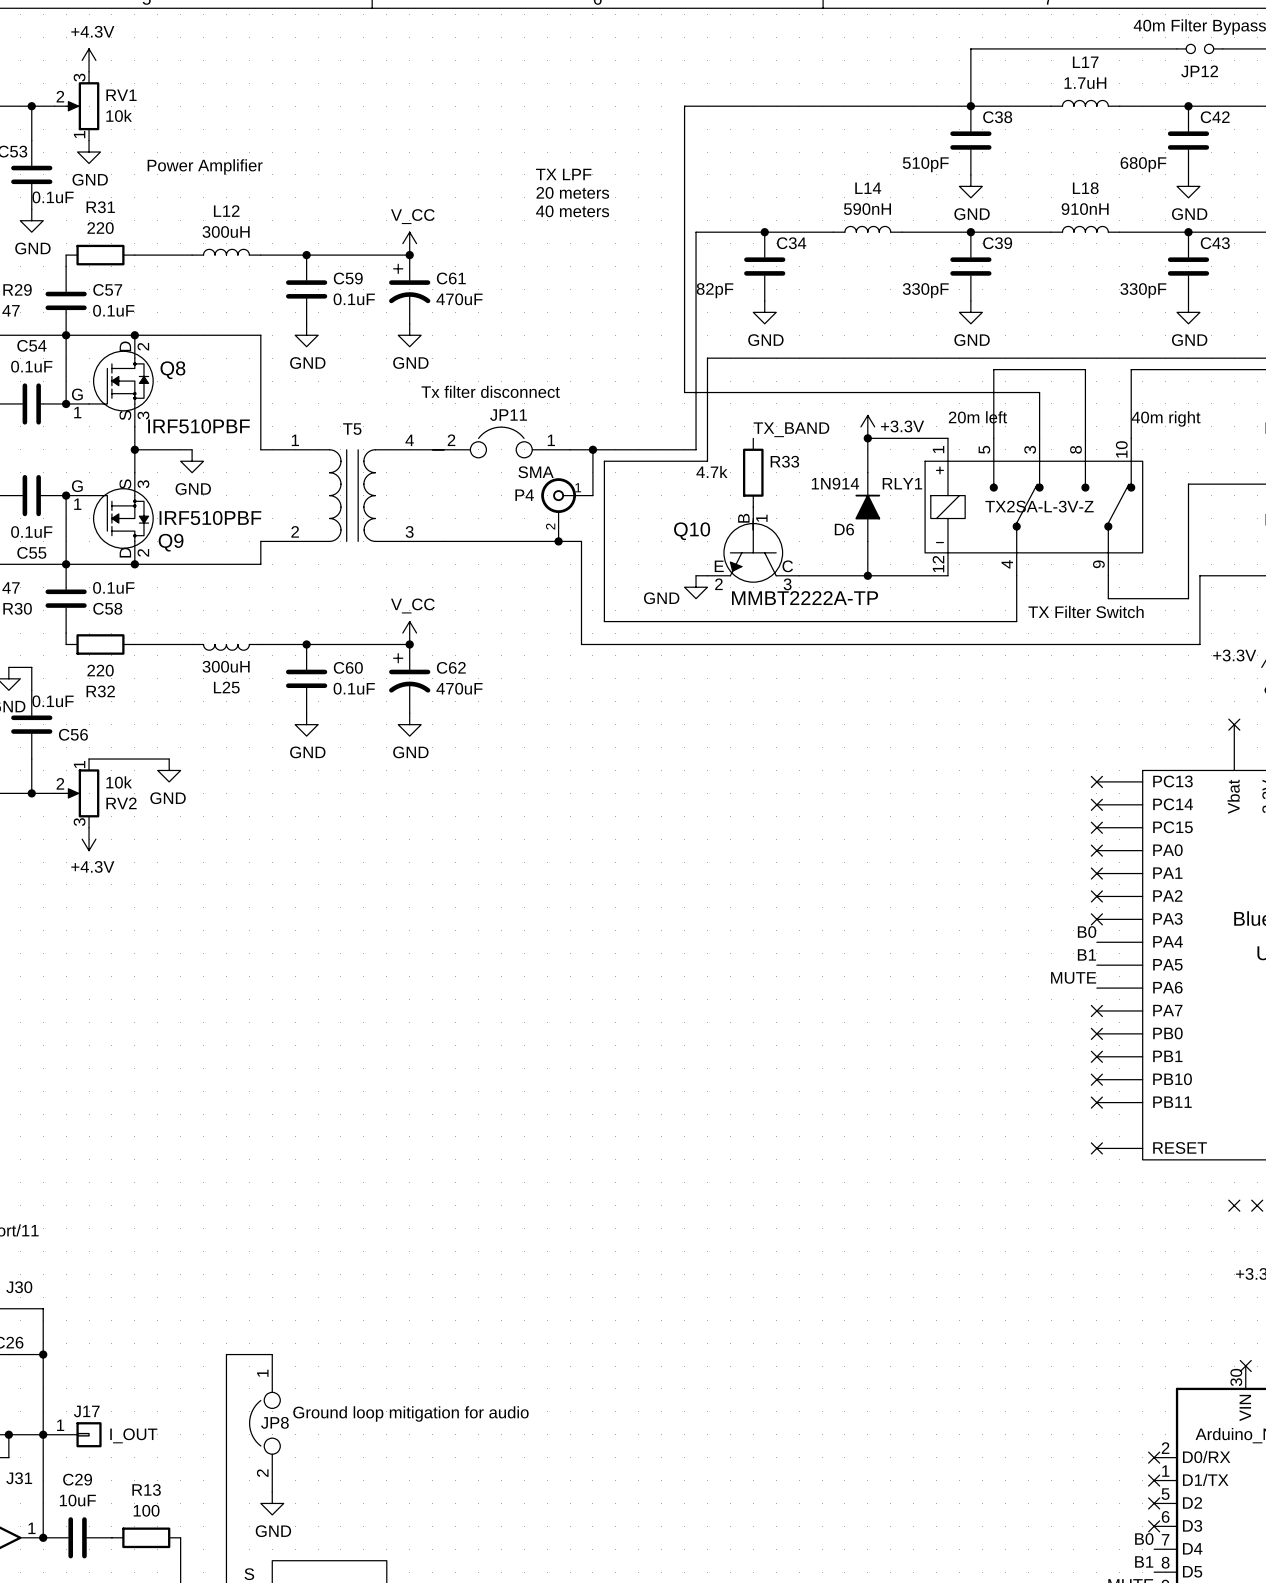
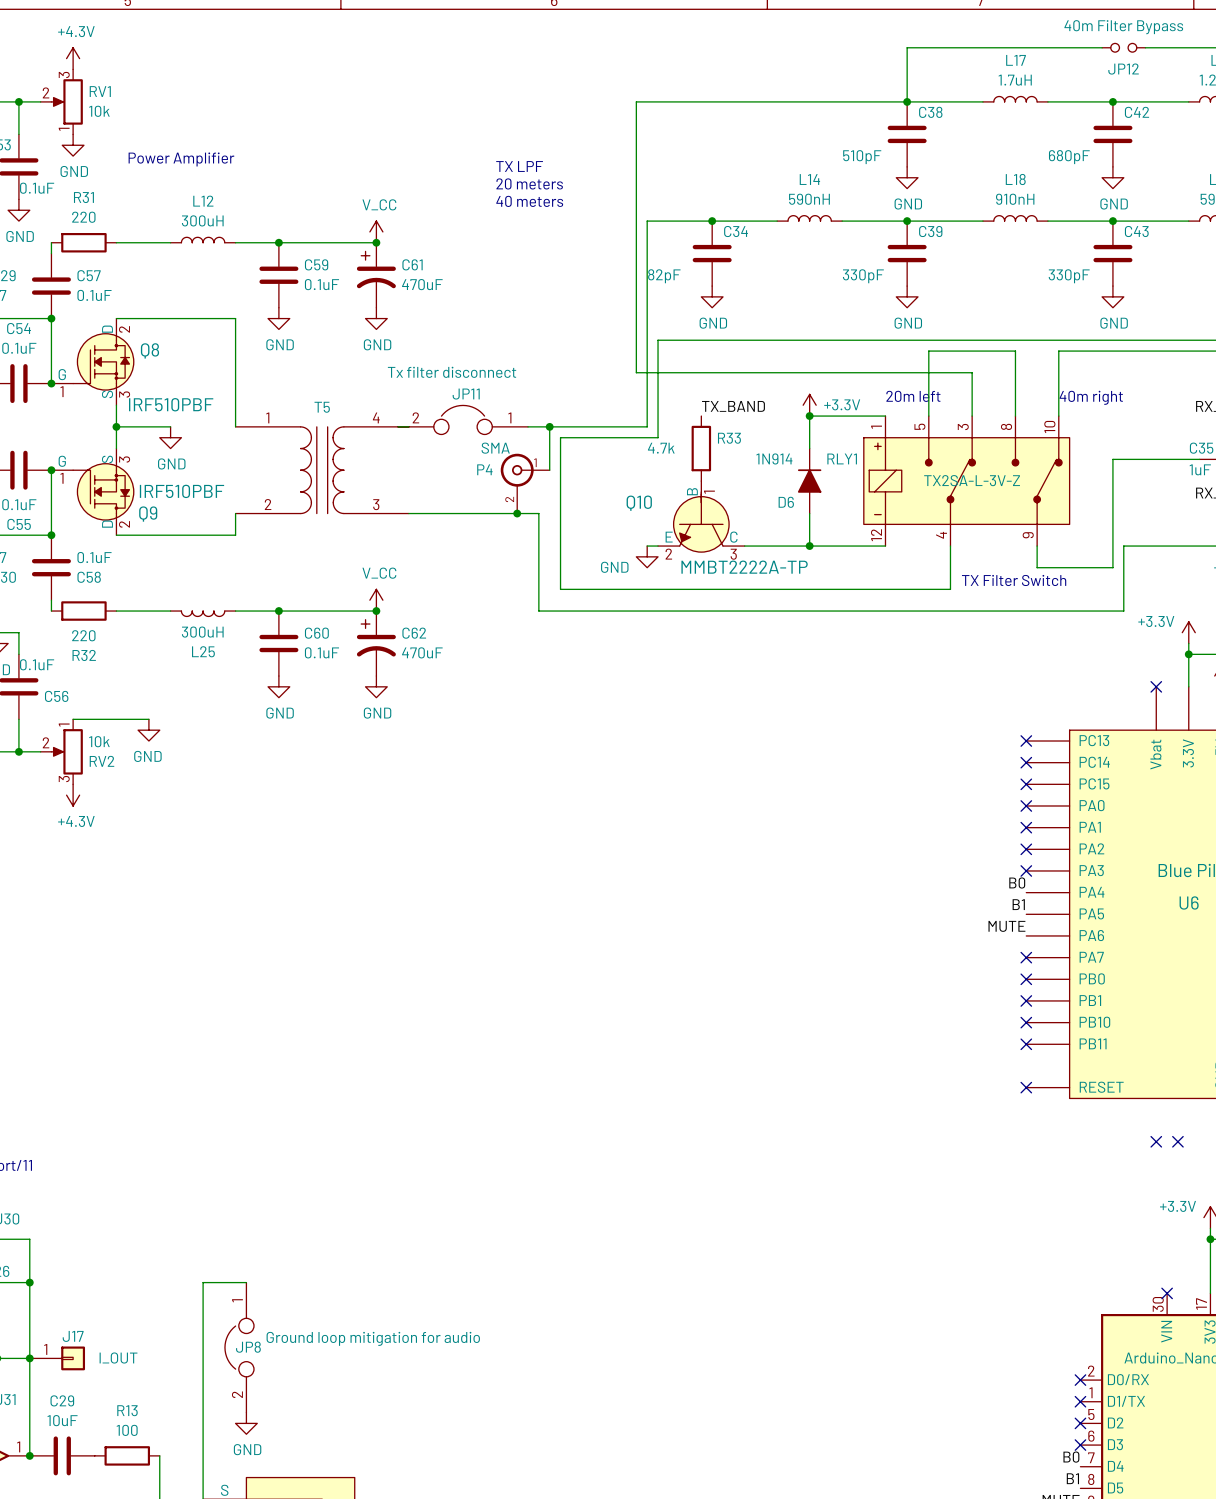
wire: (66, 335) (134, 335) -> none
junction: (134, 335) -> none
wire: (66, 564) (134, 564) -> none
junction: (134, 564) -> none

